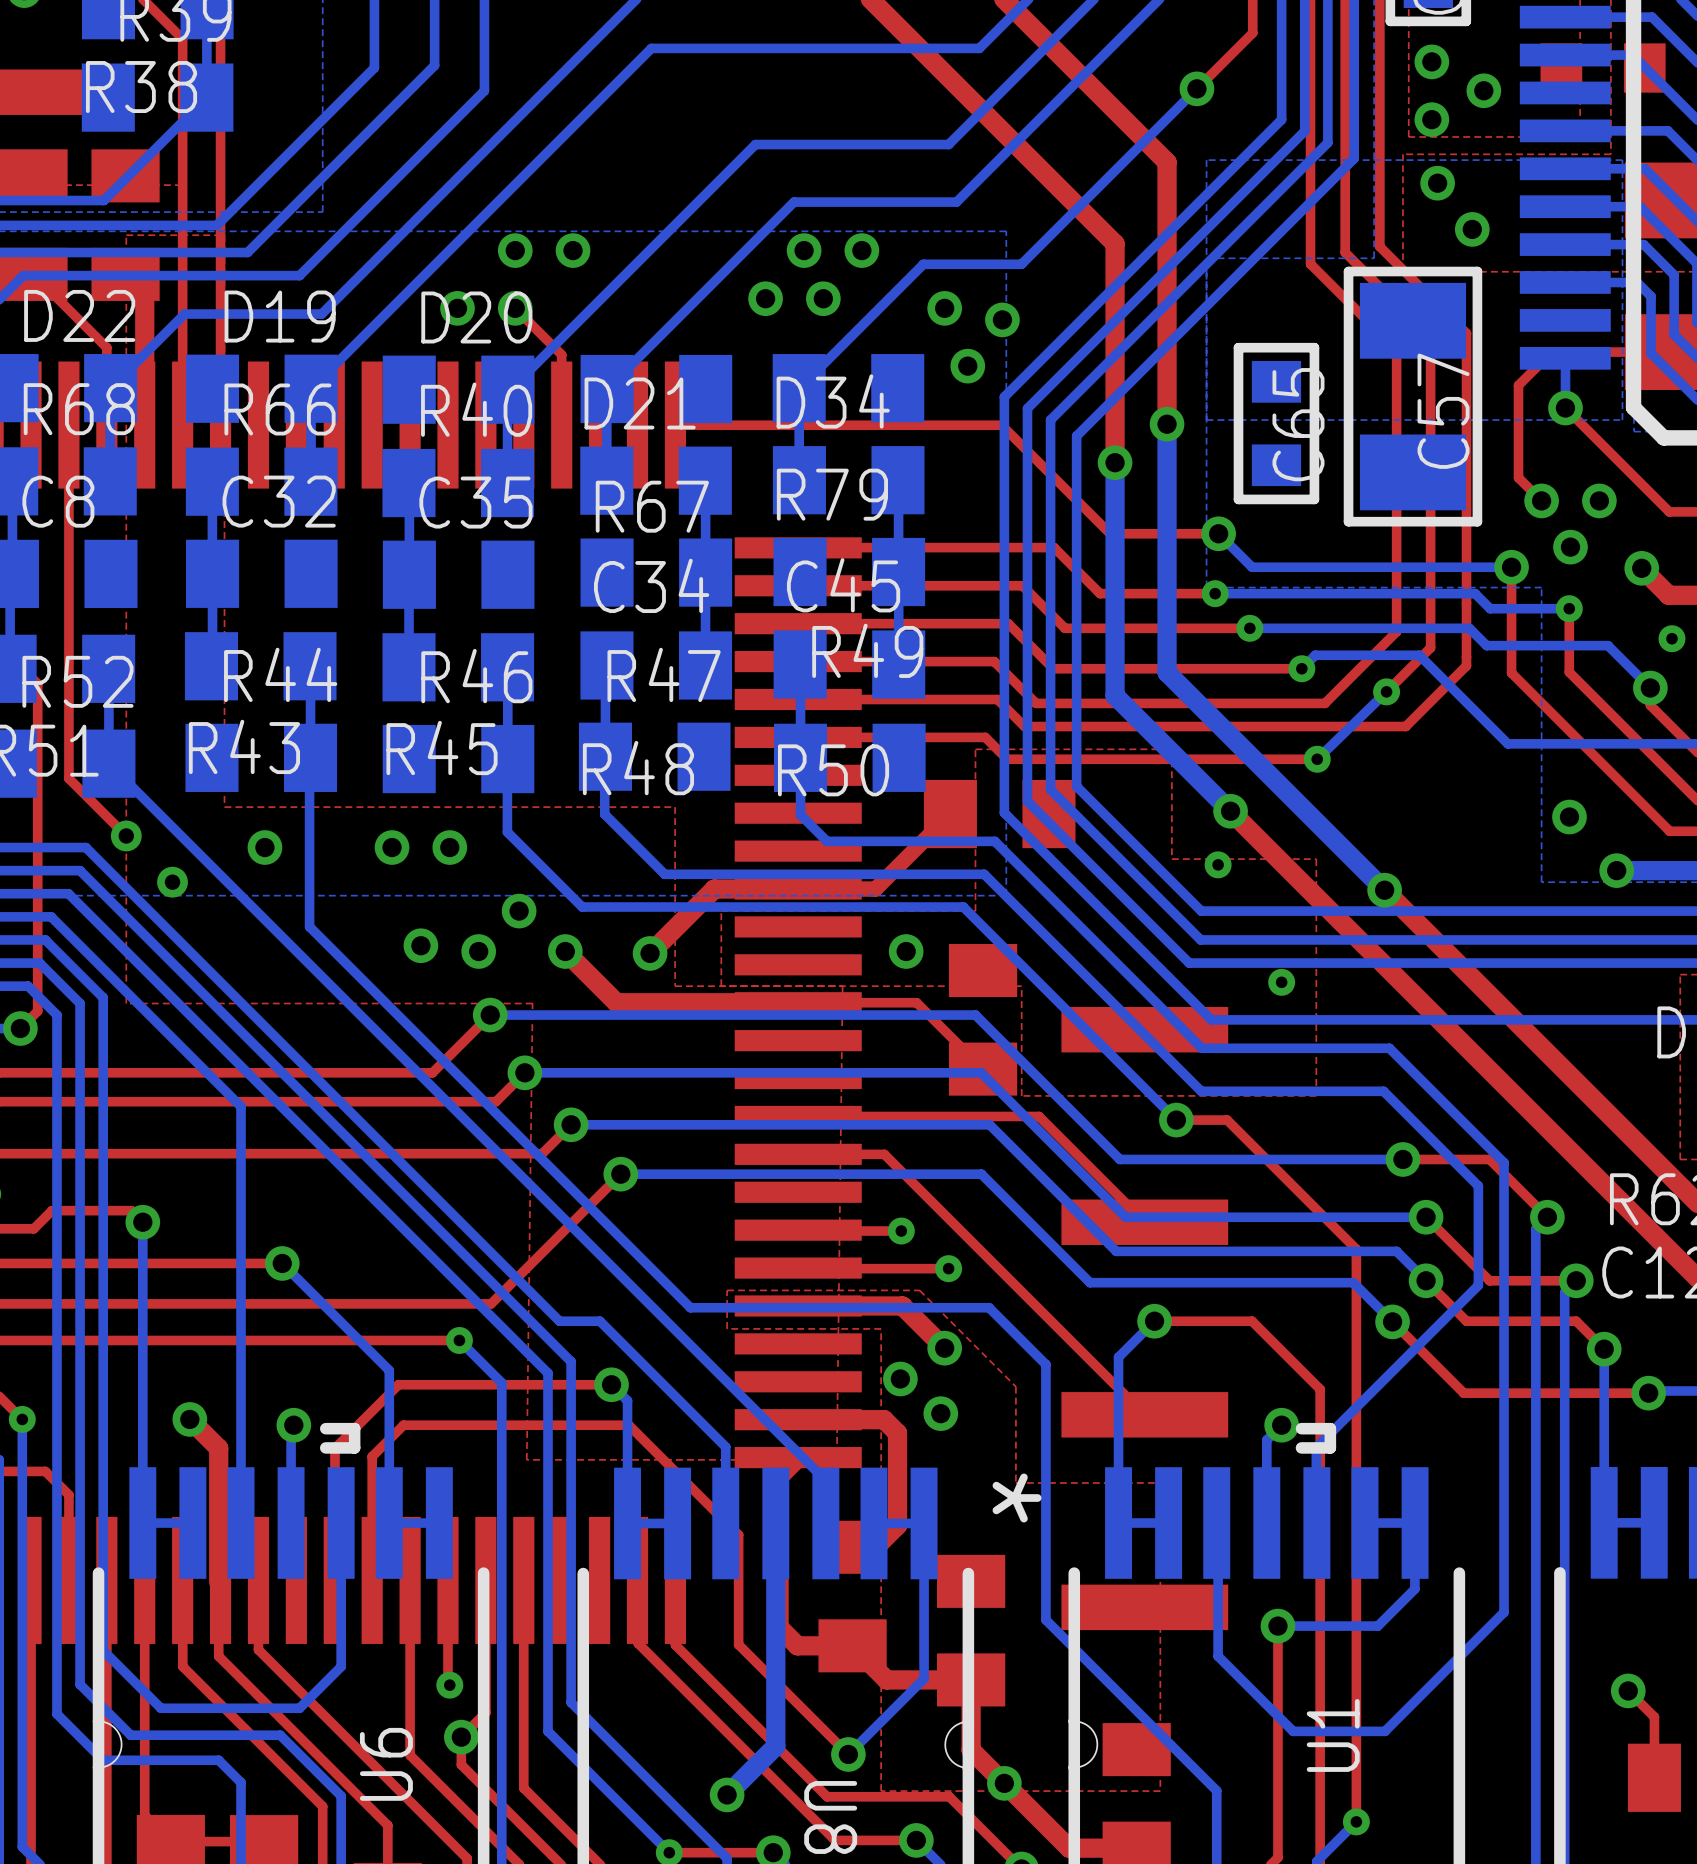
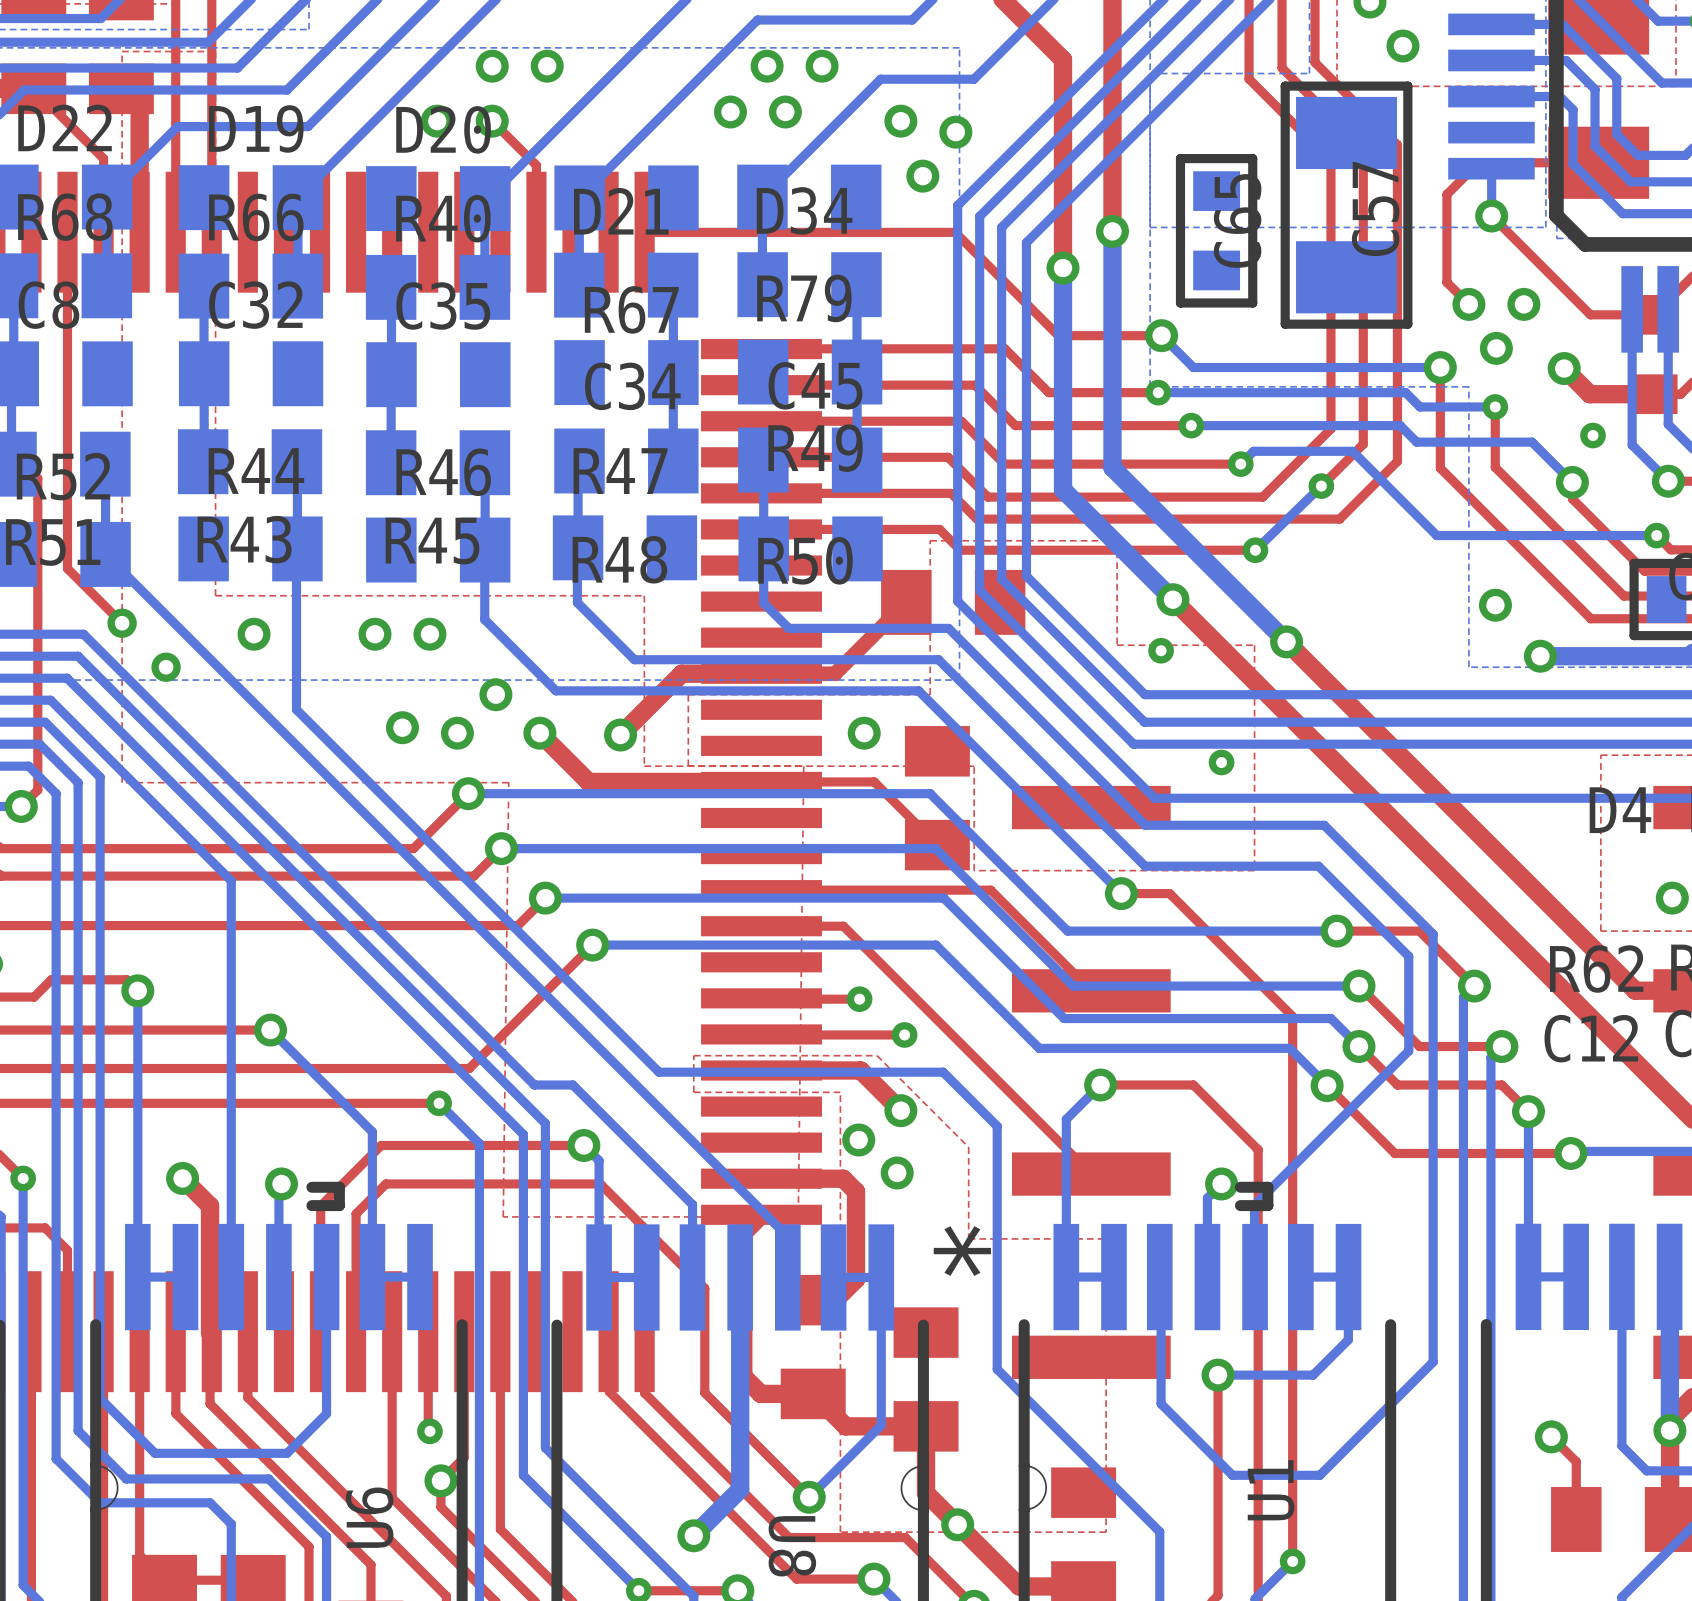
top track: none -> (1286, 641) (1319, 674)
bottom track: (1349, 855) (1384, 890) -> none
via position: (1384, 890) -> (1286, 641)

